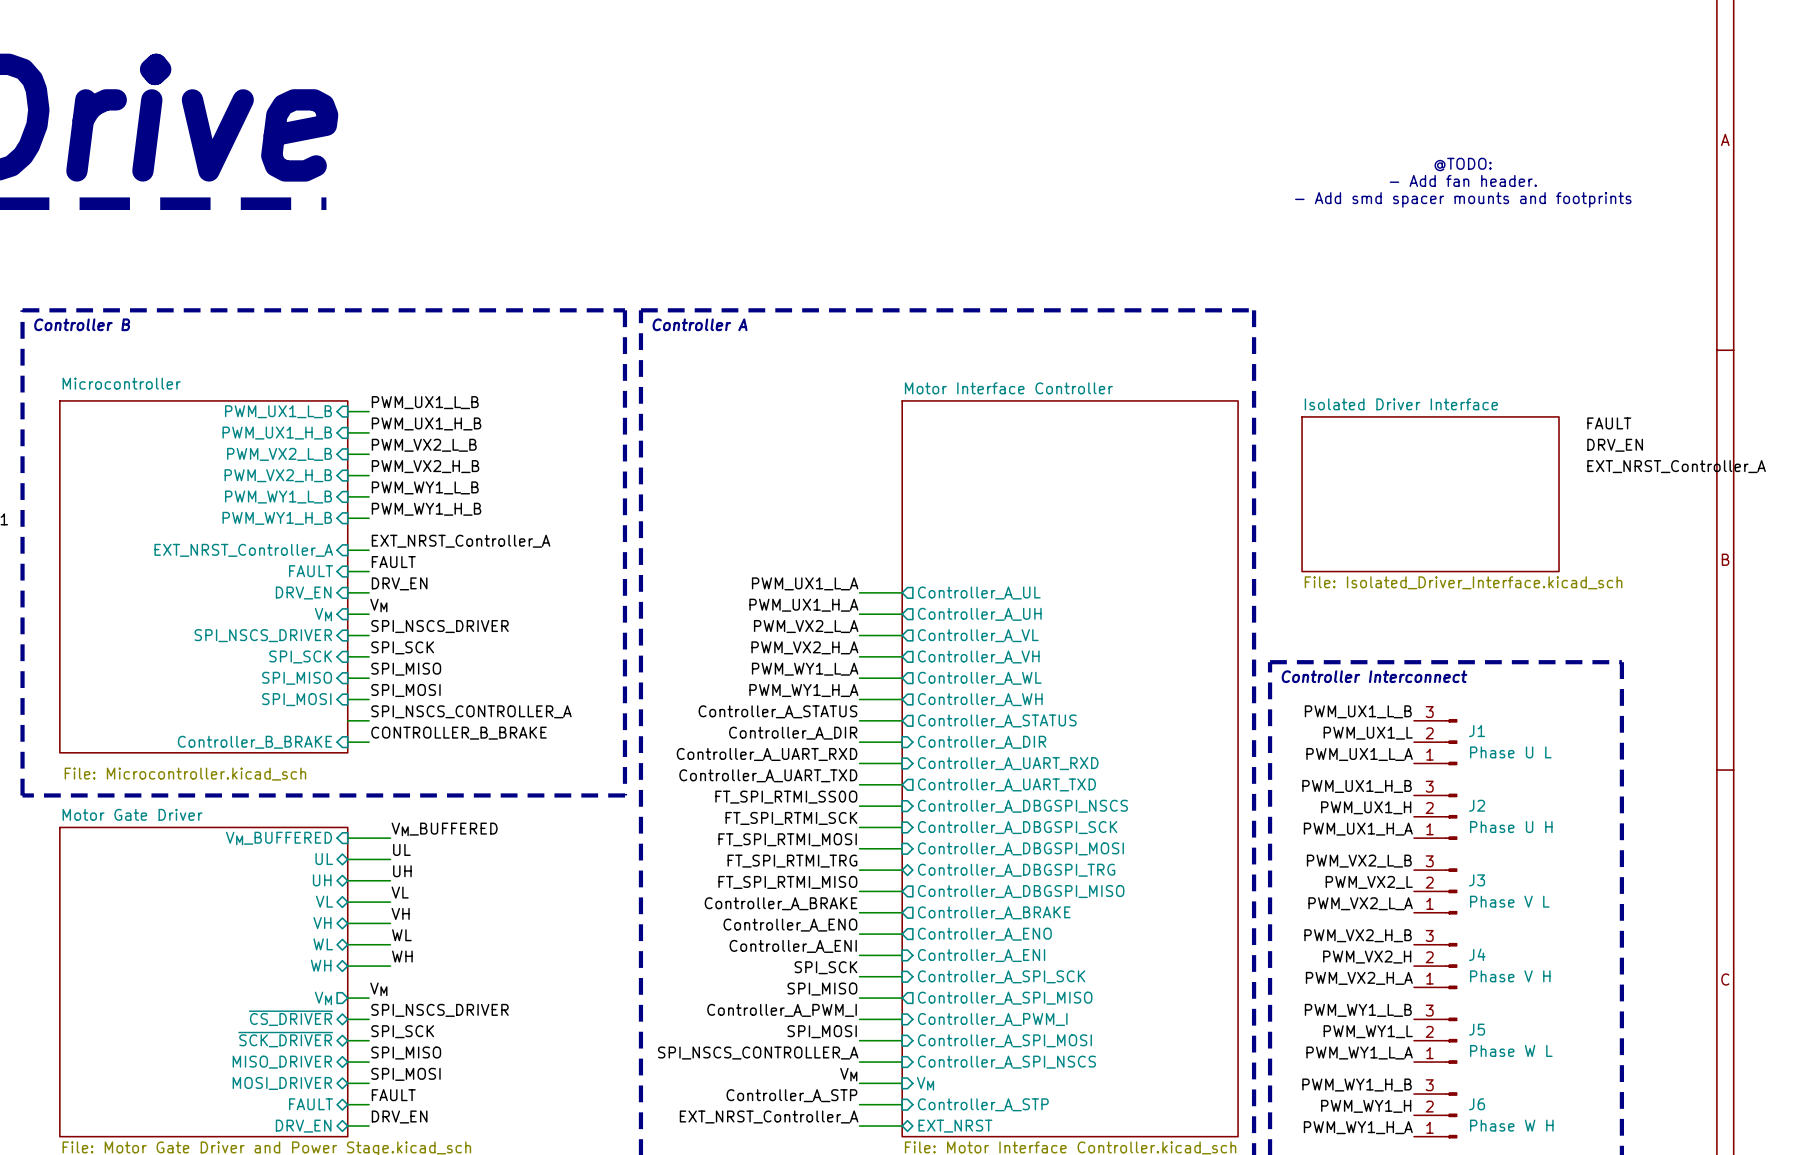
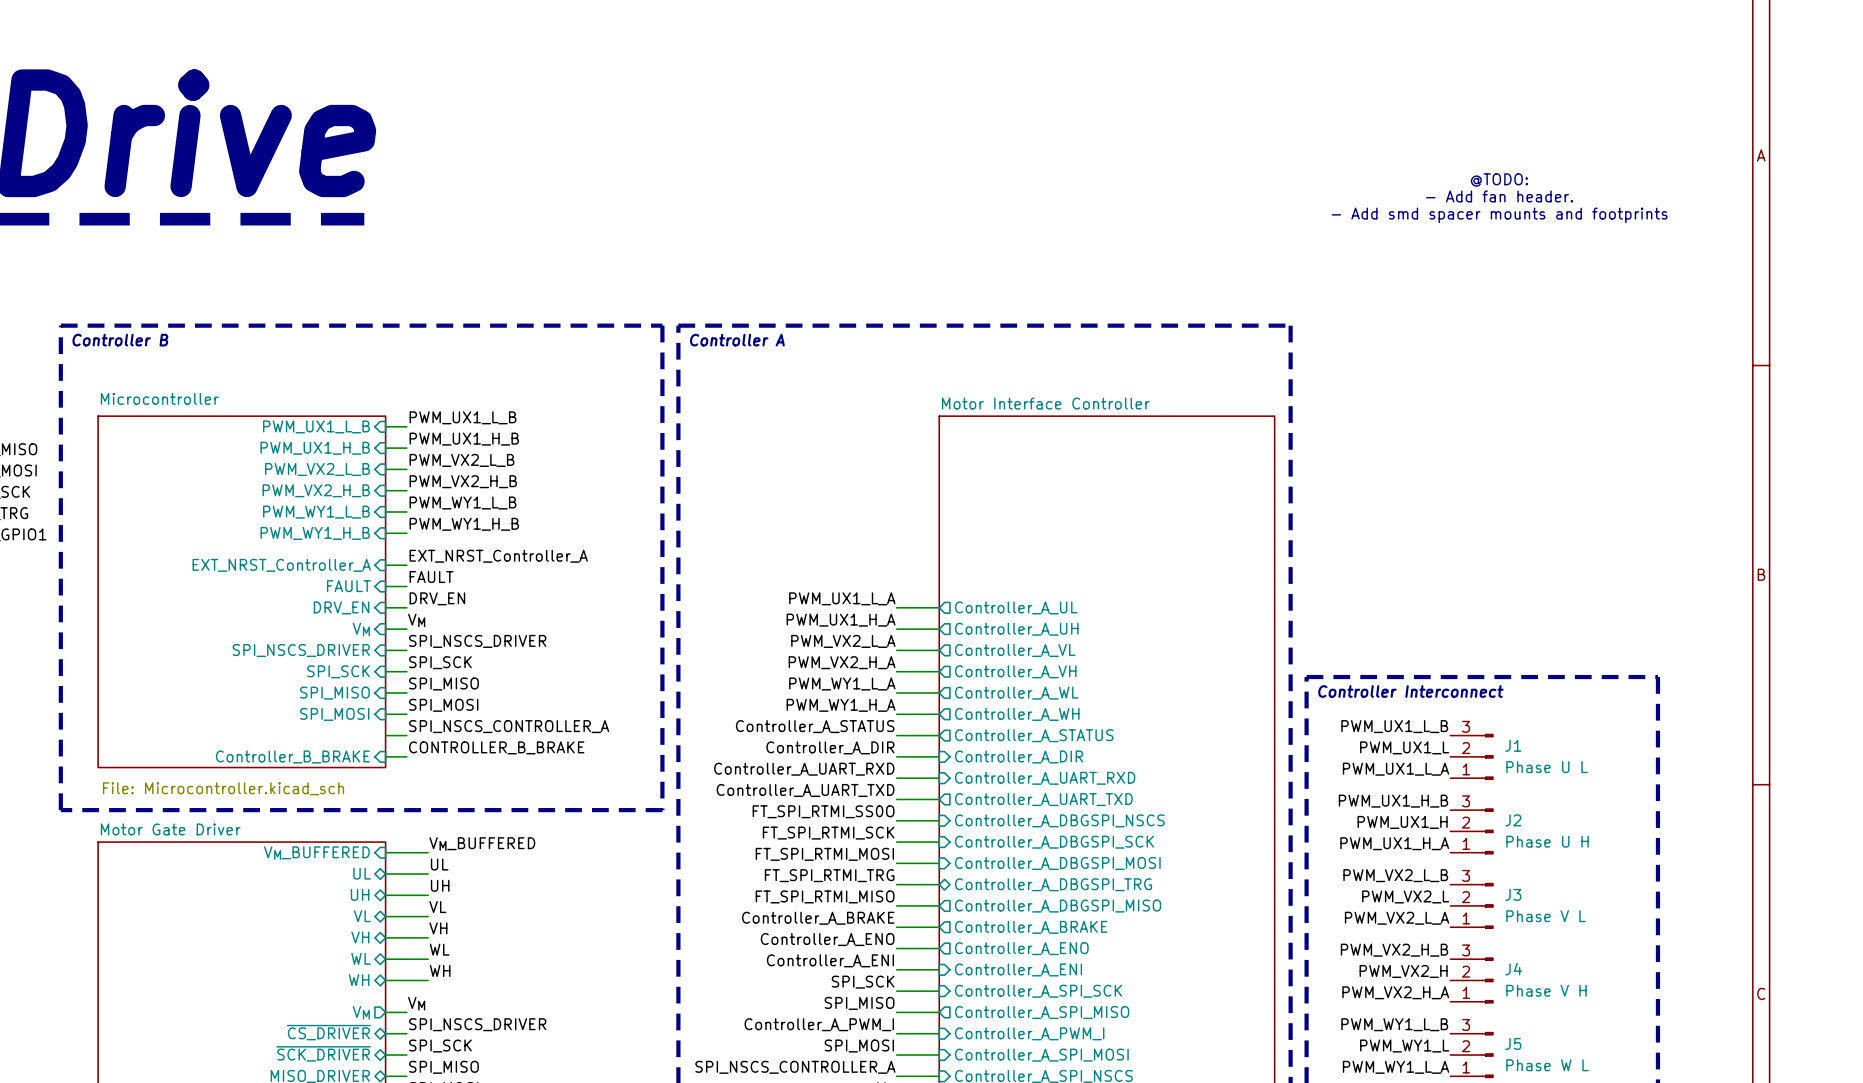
label: FAULT (1609, 423) -> none
label: DRV_EN (1615, 445) -> none
label: EXT_NRST_Controller_A (1676, 466) -> none
sheet Isolated Driver Interface: File: Isolated_Driver_Interface.kicad_sch (1430, 494) -> none

